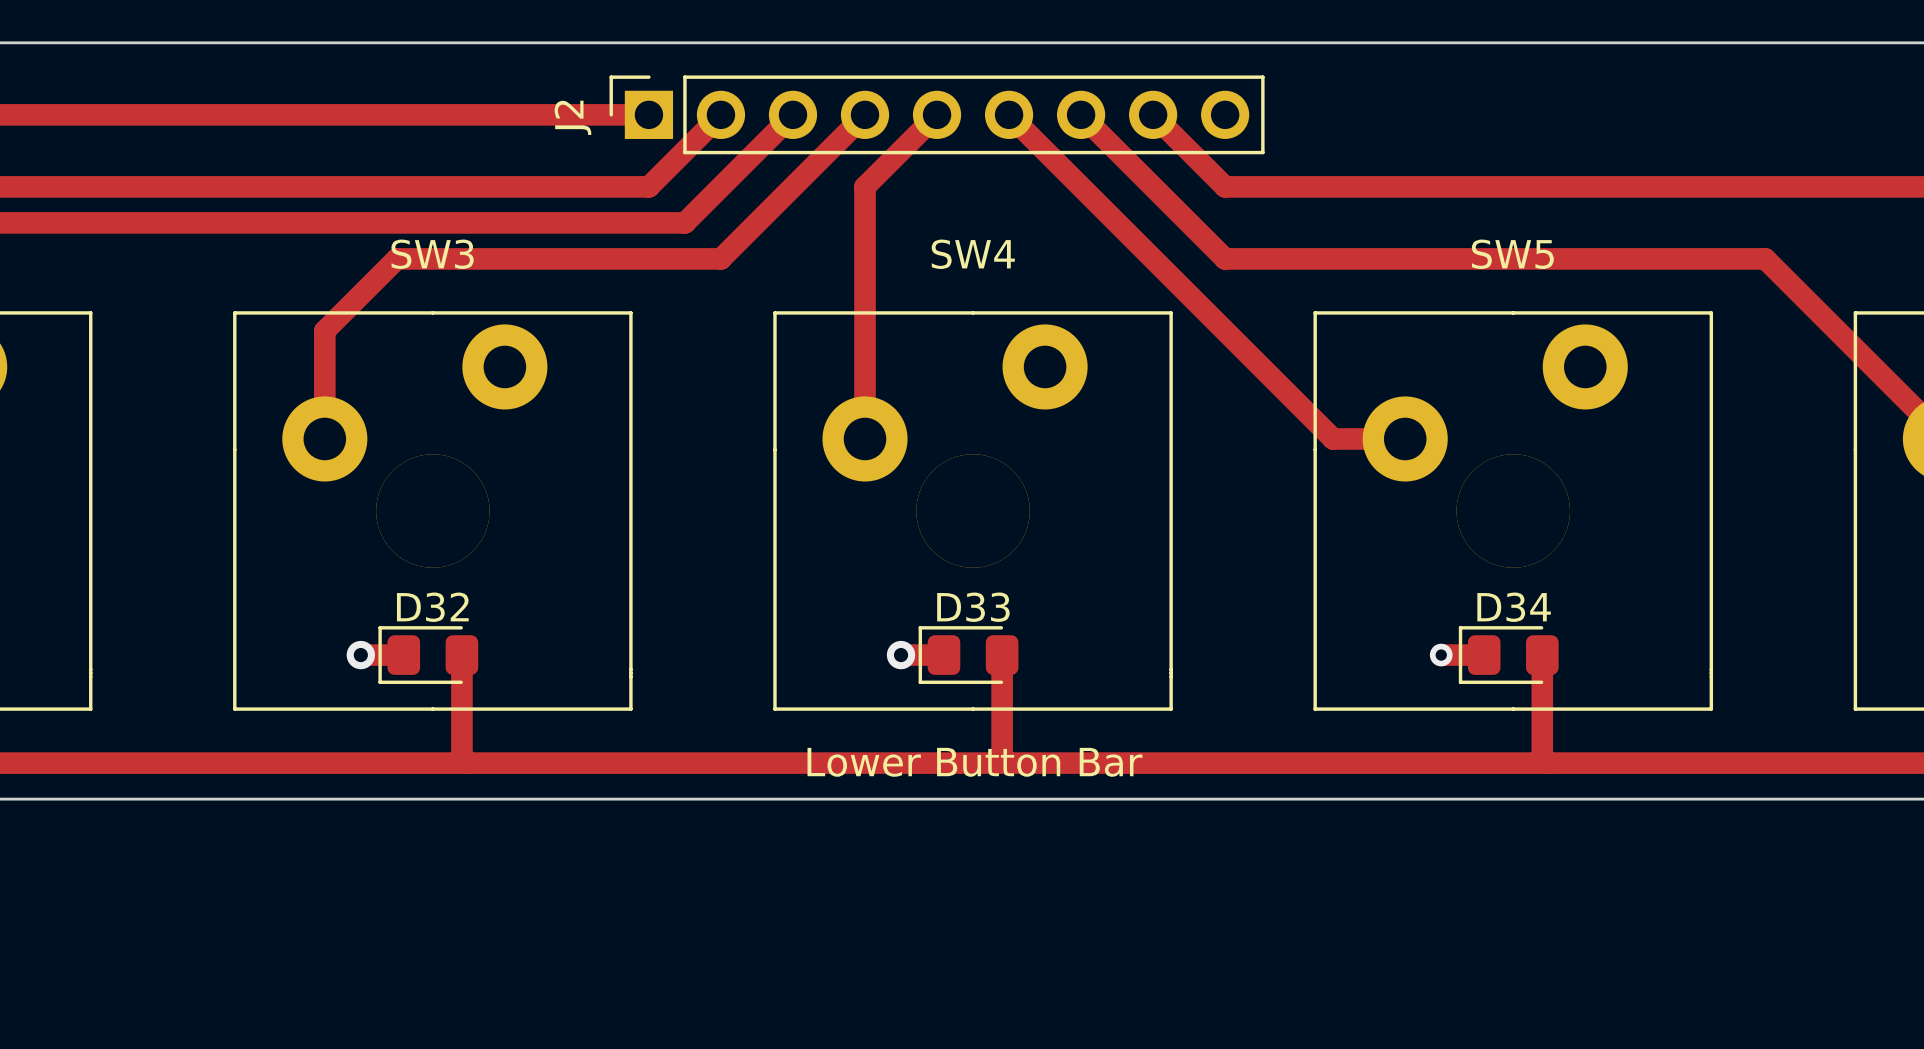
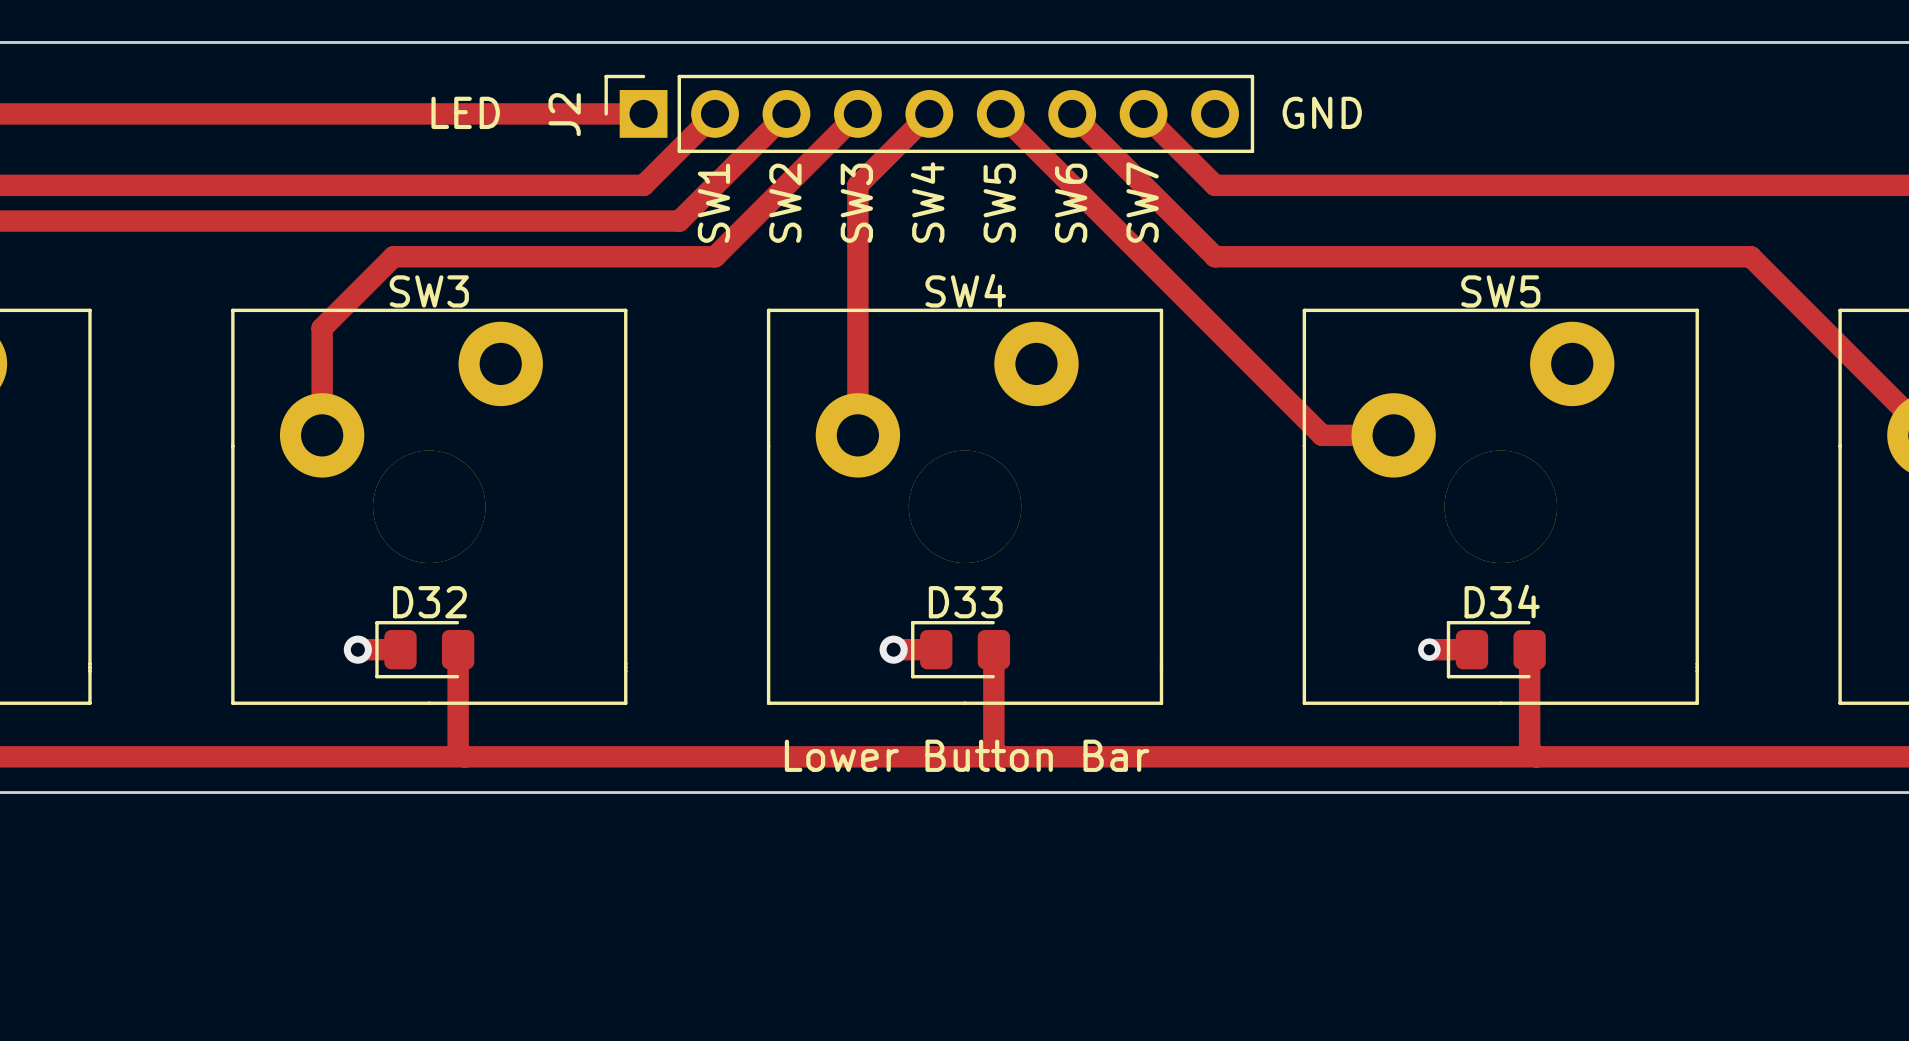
text: none -> LED (465, 112)
text: none -> GND (1322, 112)
text: none -> SW4 (927, 202)
text: none -> SW6 (1071, 203)
text: none -> SW1 (713, 203)
text: none -> SW2 (785, 203)
text: none -> SW3 (856, 203)
text: none -> SW5 (999, 203)
text: none -> SW7 (1142, 202)
SW3 name position: SW3 (432, 254) -> SW3 (429, 291)
SW4 name position: SW4 (973, 254) -> SW4 (965, 290)
SW5 name position: SW5 (1512, 254) -> SW5 (1500, 291)

